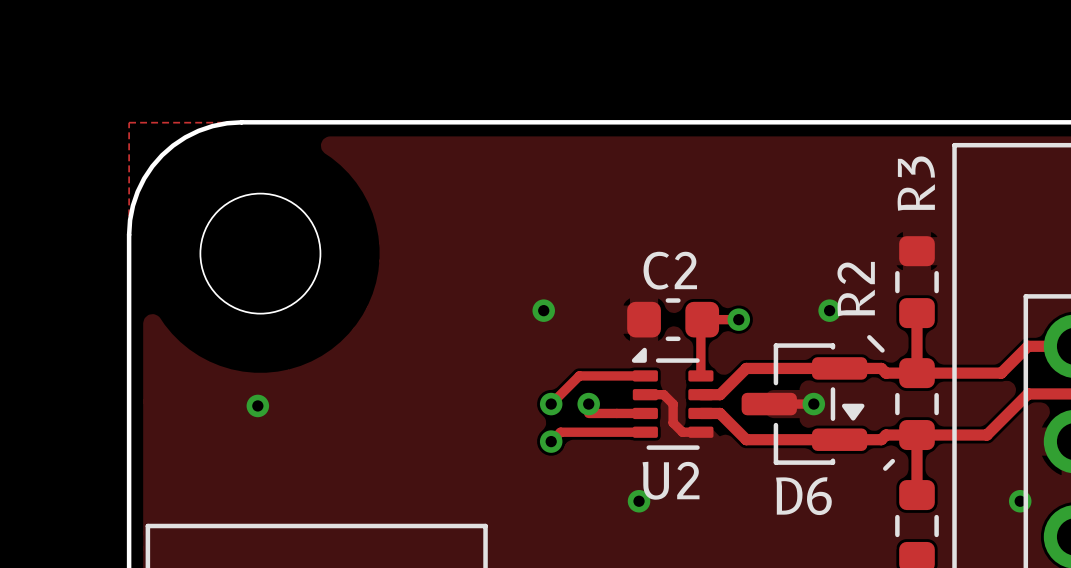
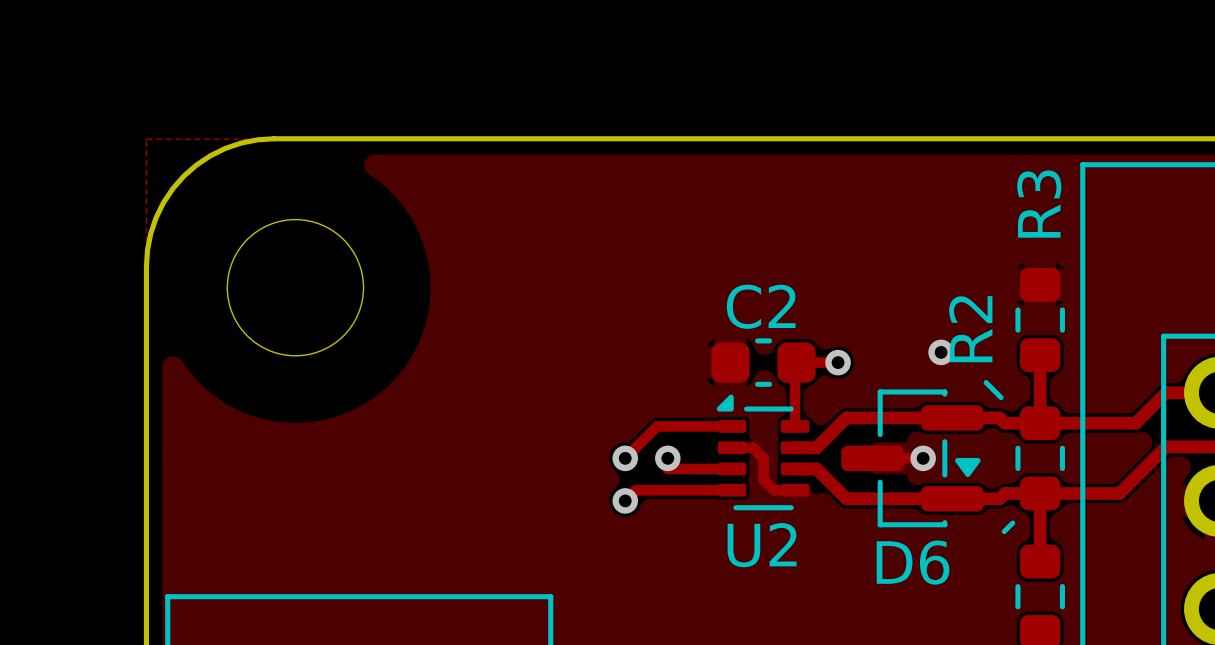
via: (543, 310) -> none
via: (257, 405) -> none
via: (639, 501) -> none
via: (1020, 501) -> none

